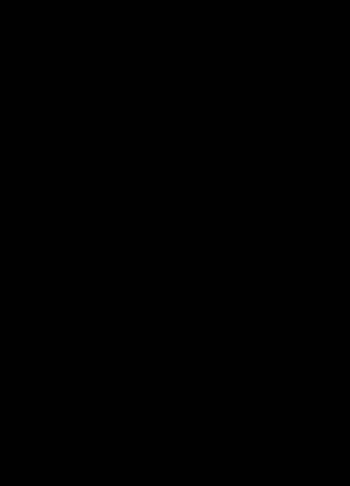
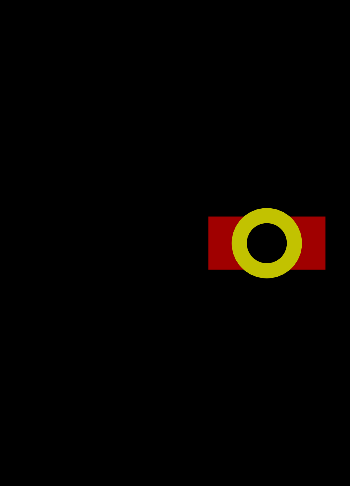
part: none -> (266, 243)
part: none -> (266, 243)

